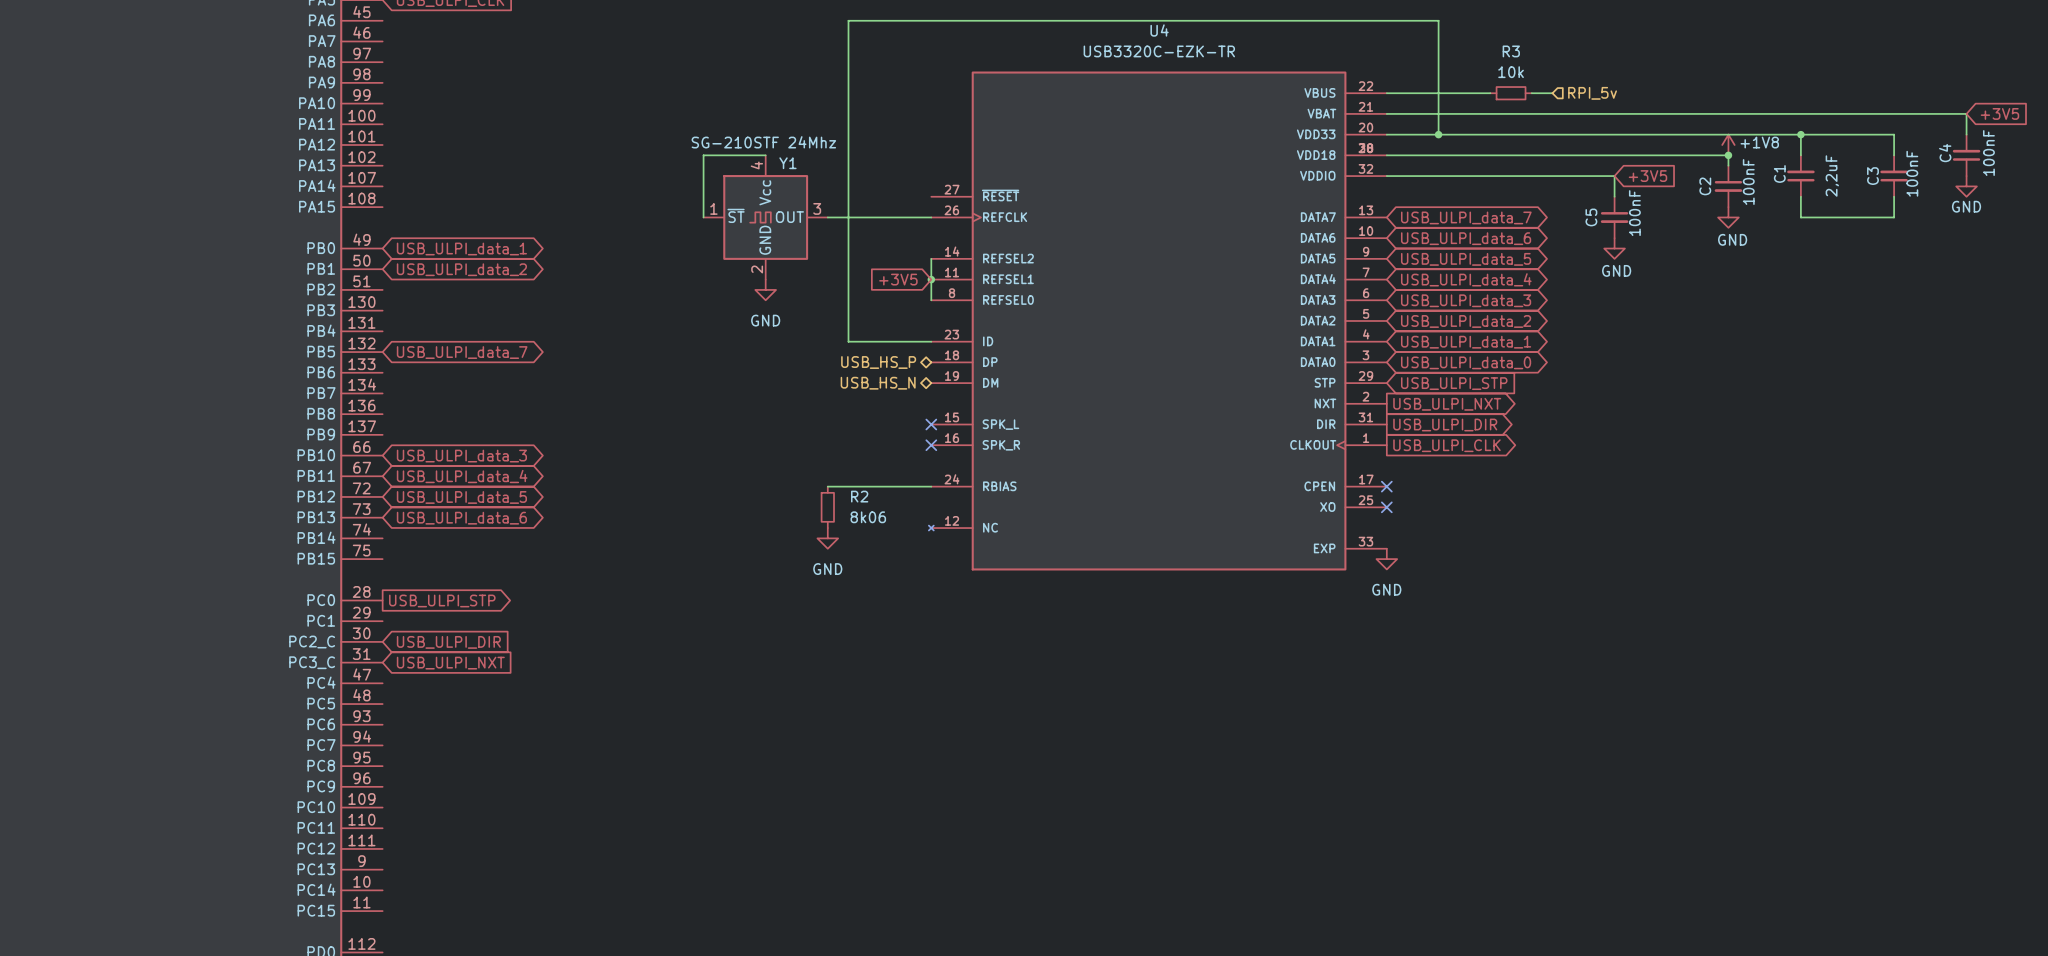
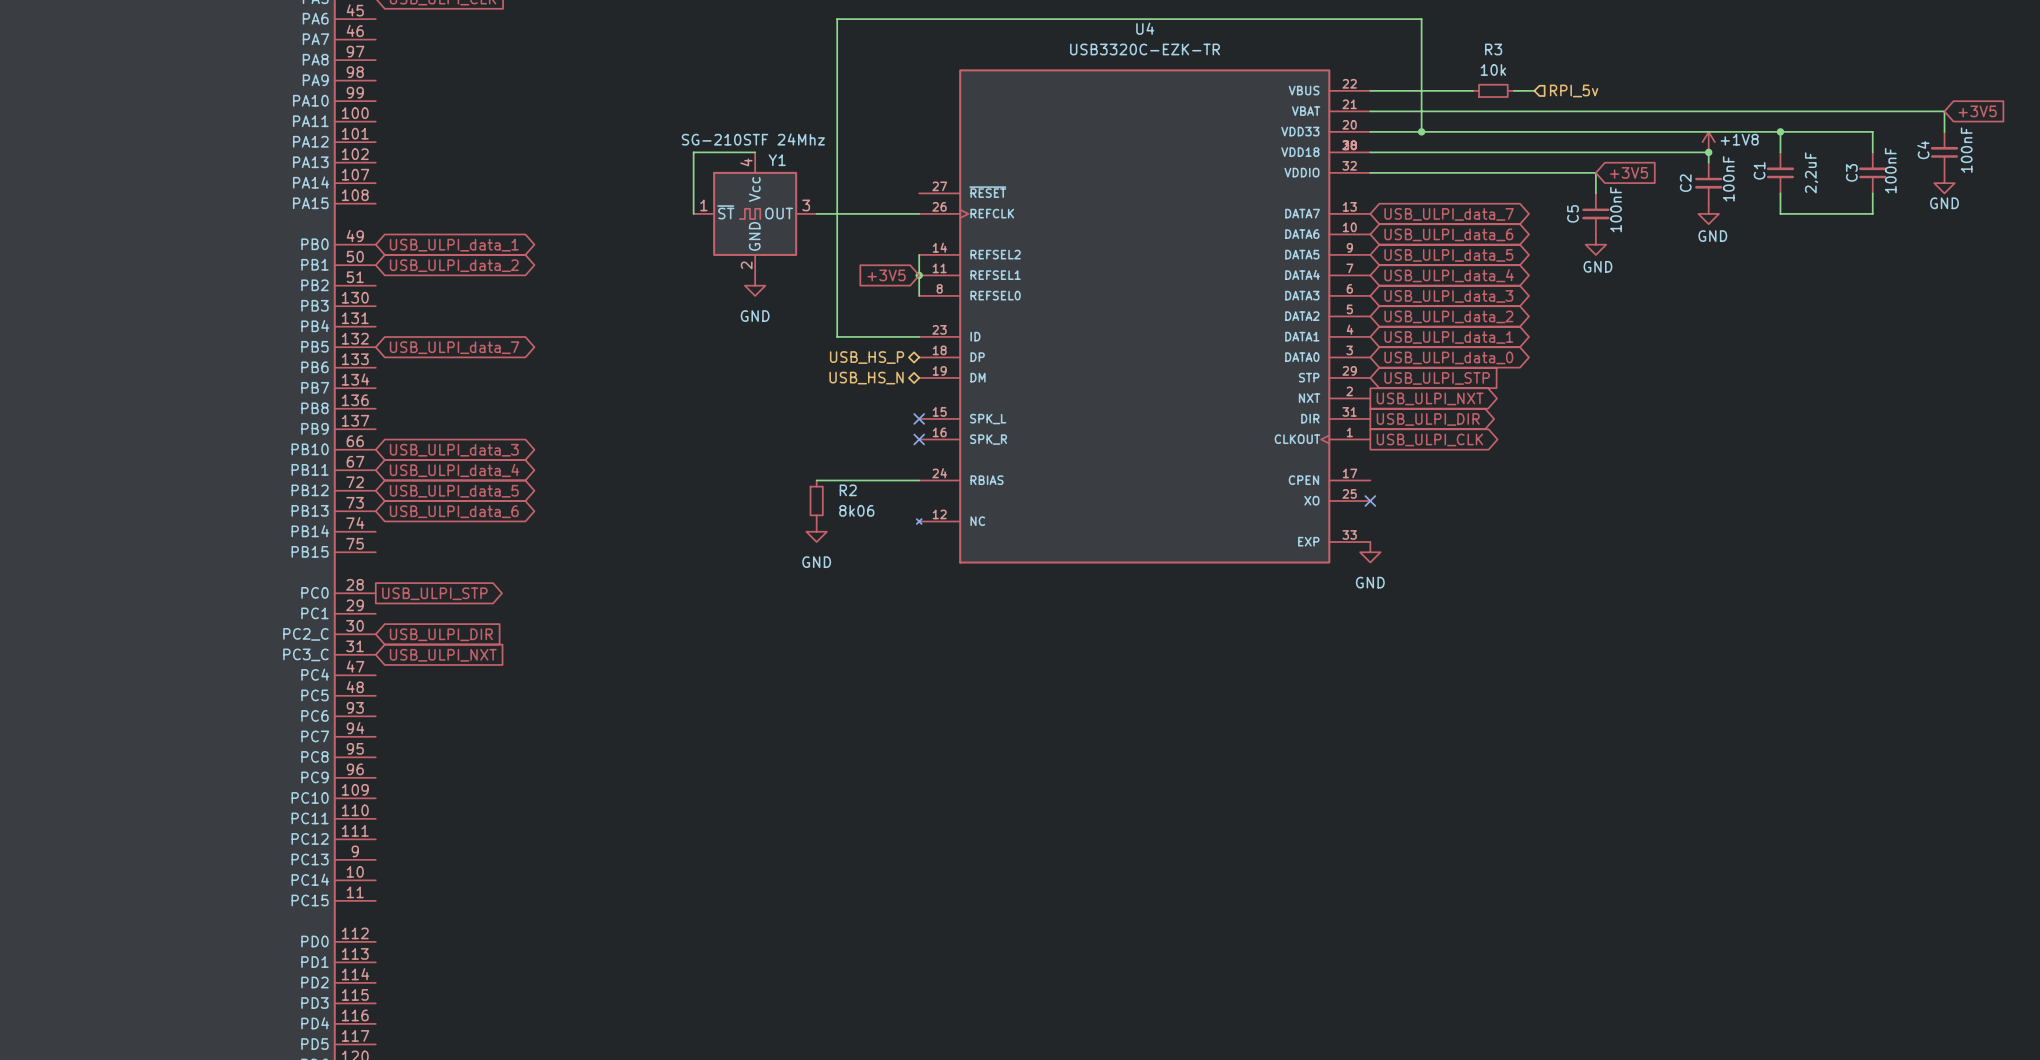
no-connect mark: (1386, 486) -> none

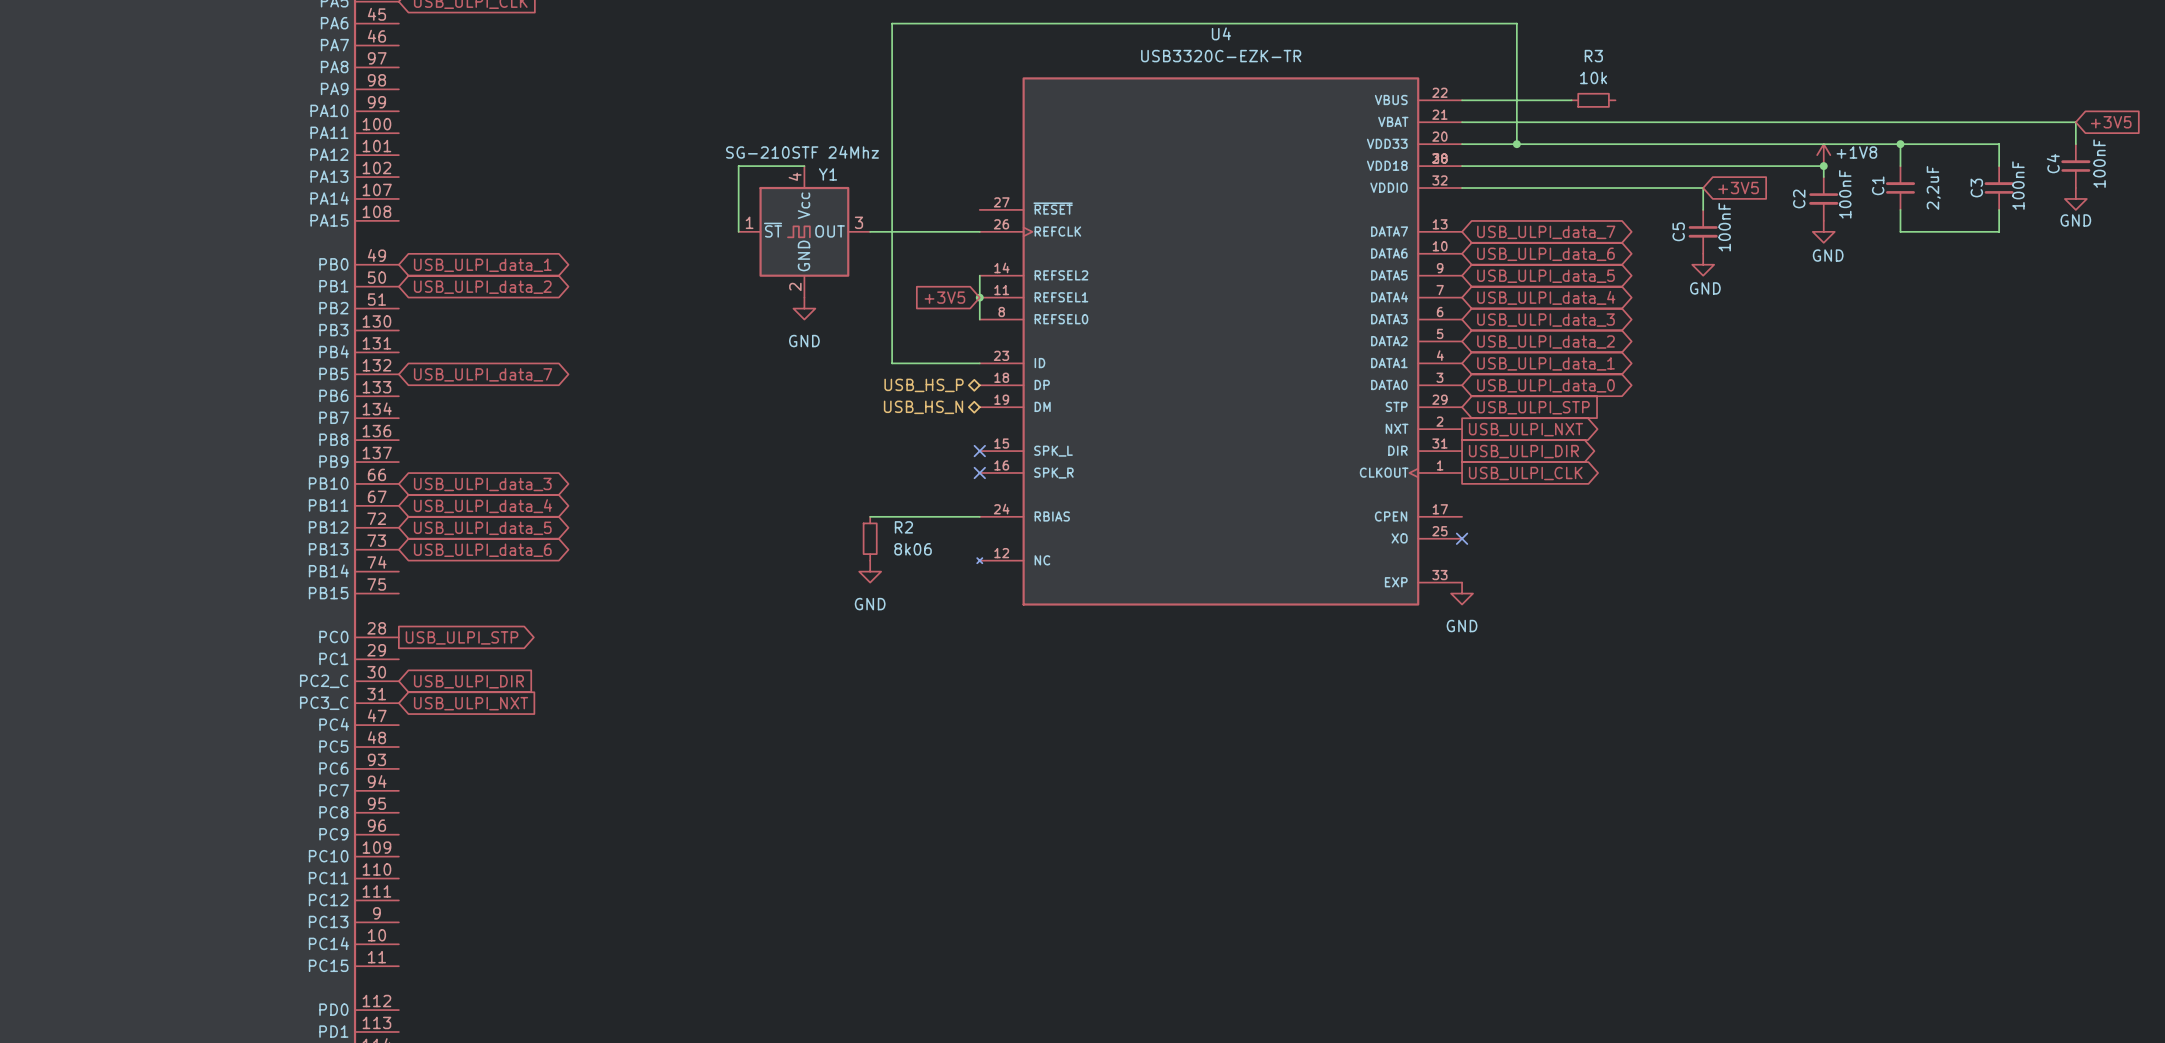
wire: (1513, 90) (1534, 90) -> none
hierarchical label: RPI_5v (1574, 90) -> none

